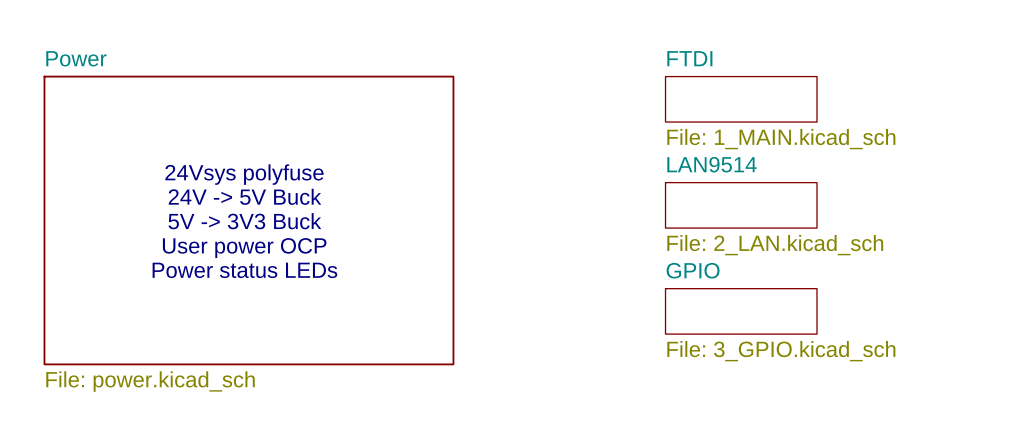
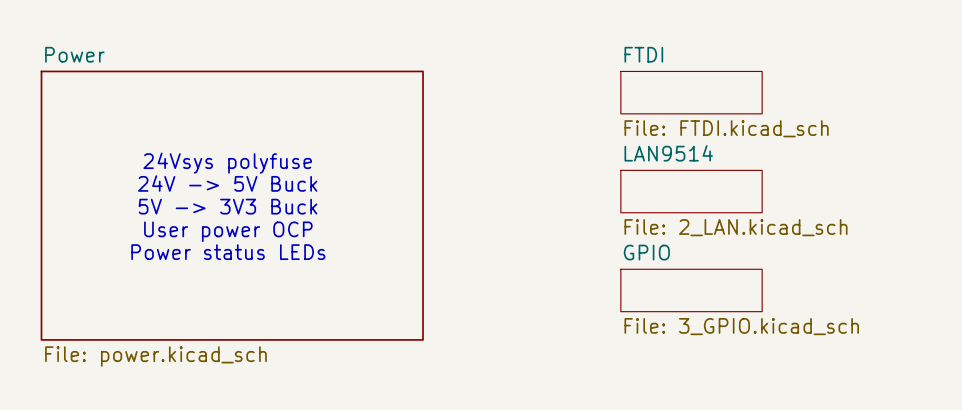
sheet FTDI value: File: 1_MAIN.kicad_sch (781, 139) -> File: FTDI.kicad_sch (726, 128)

